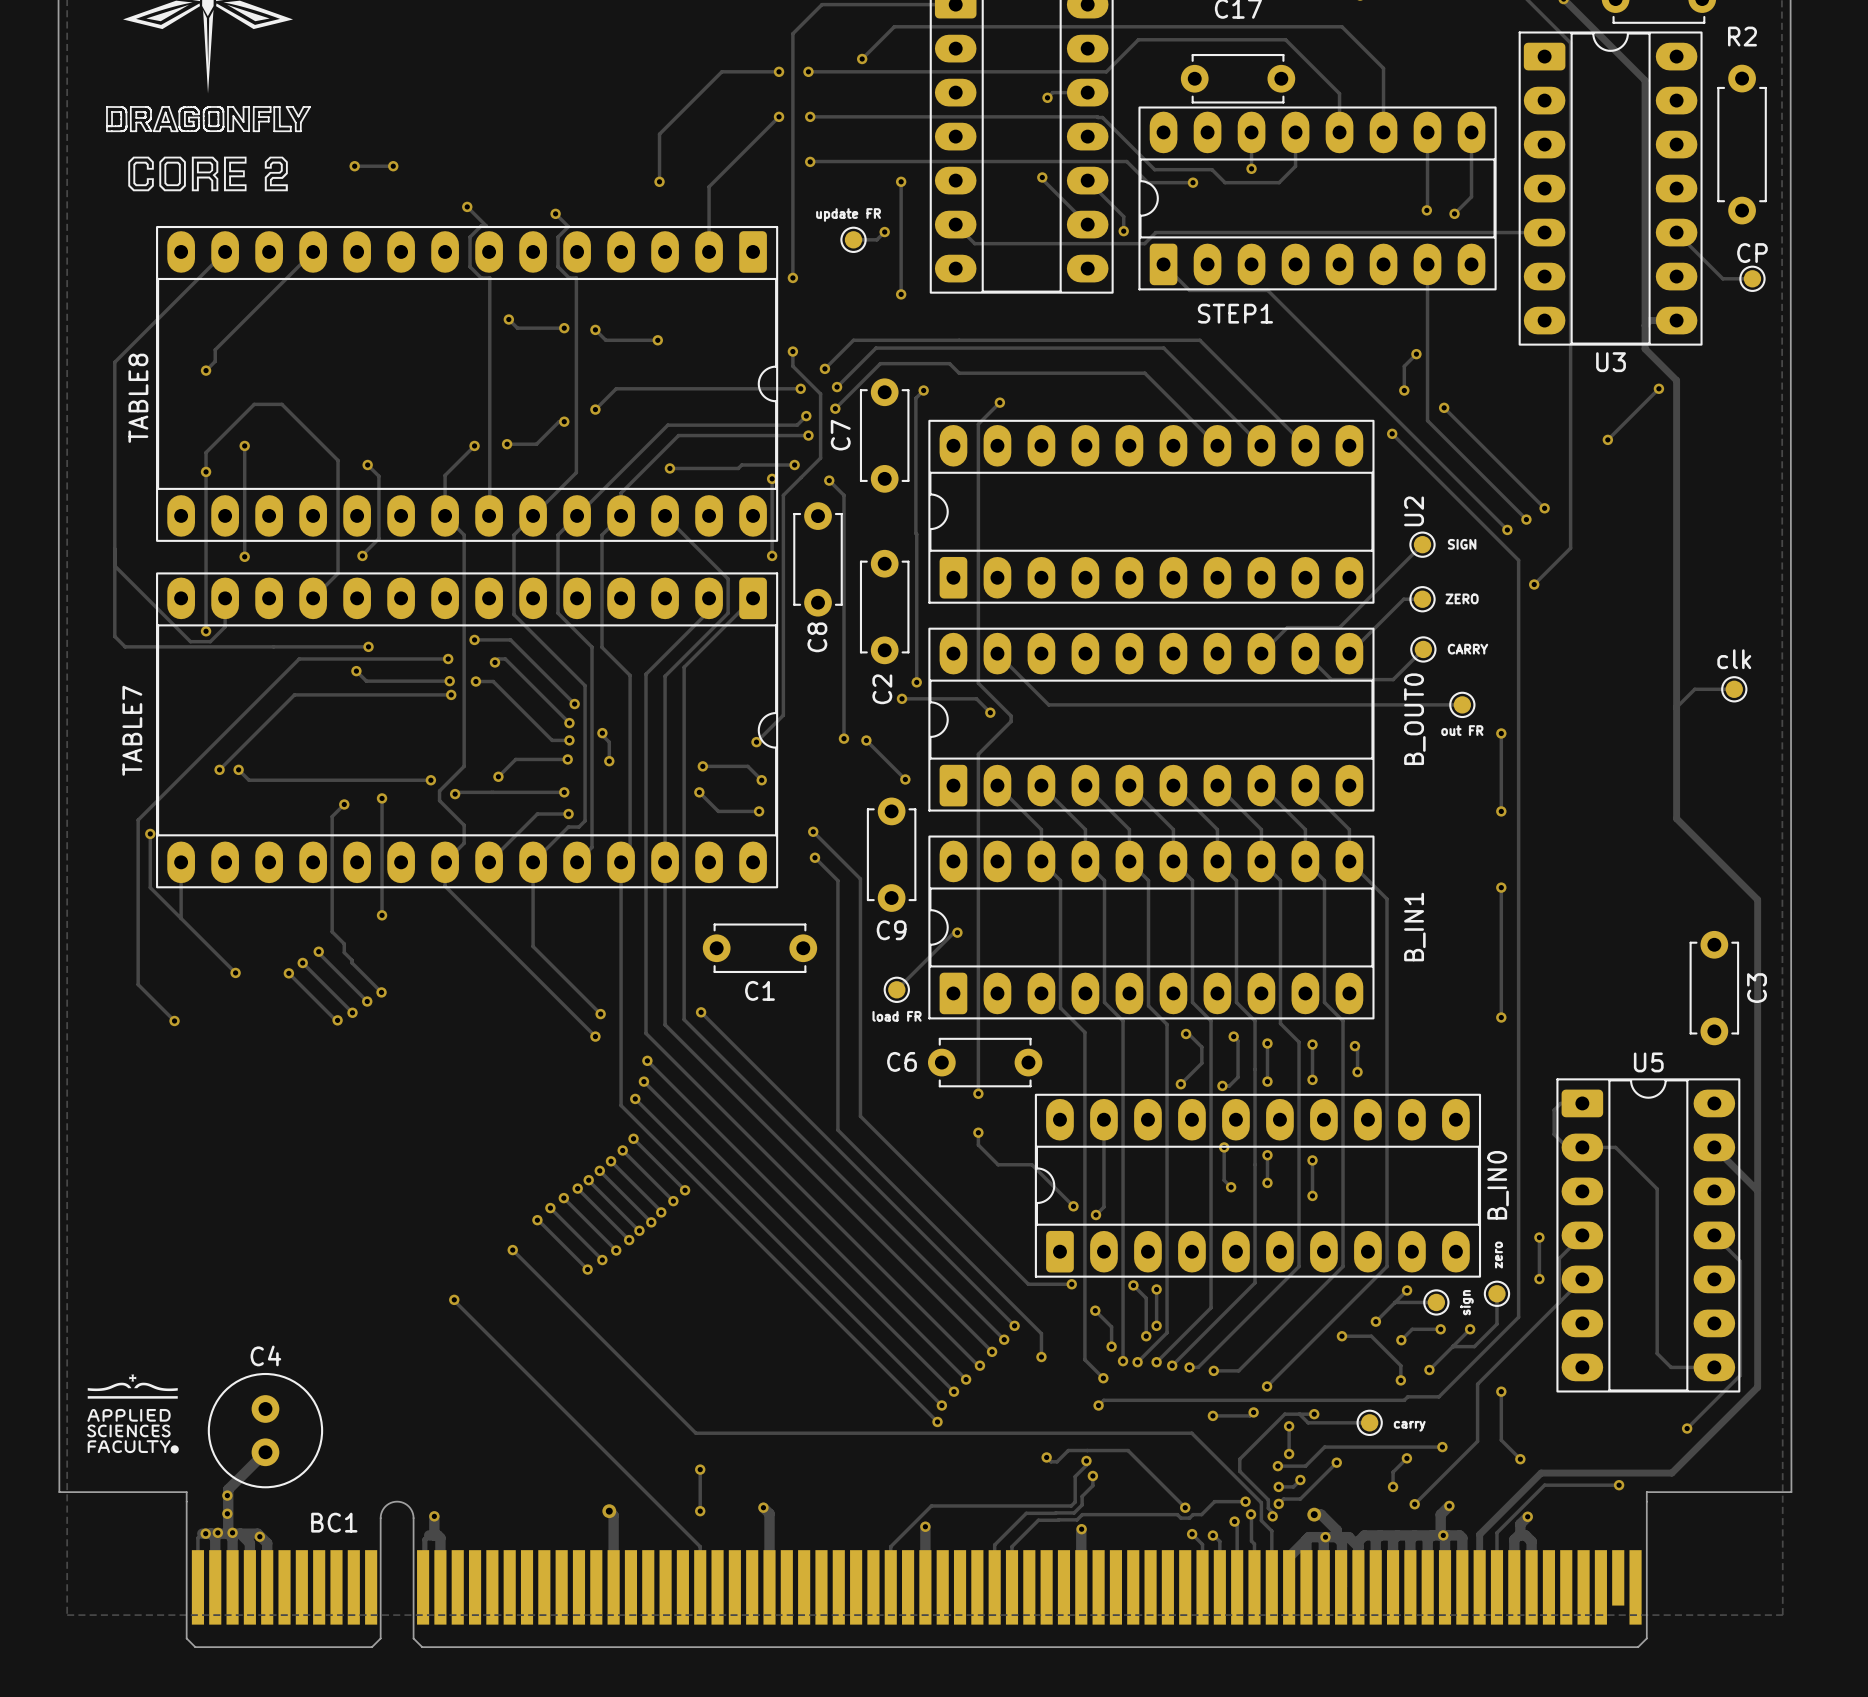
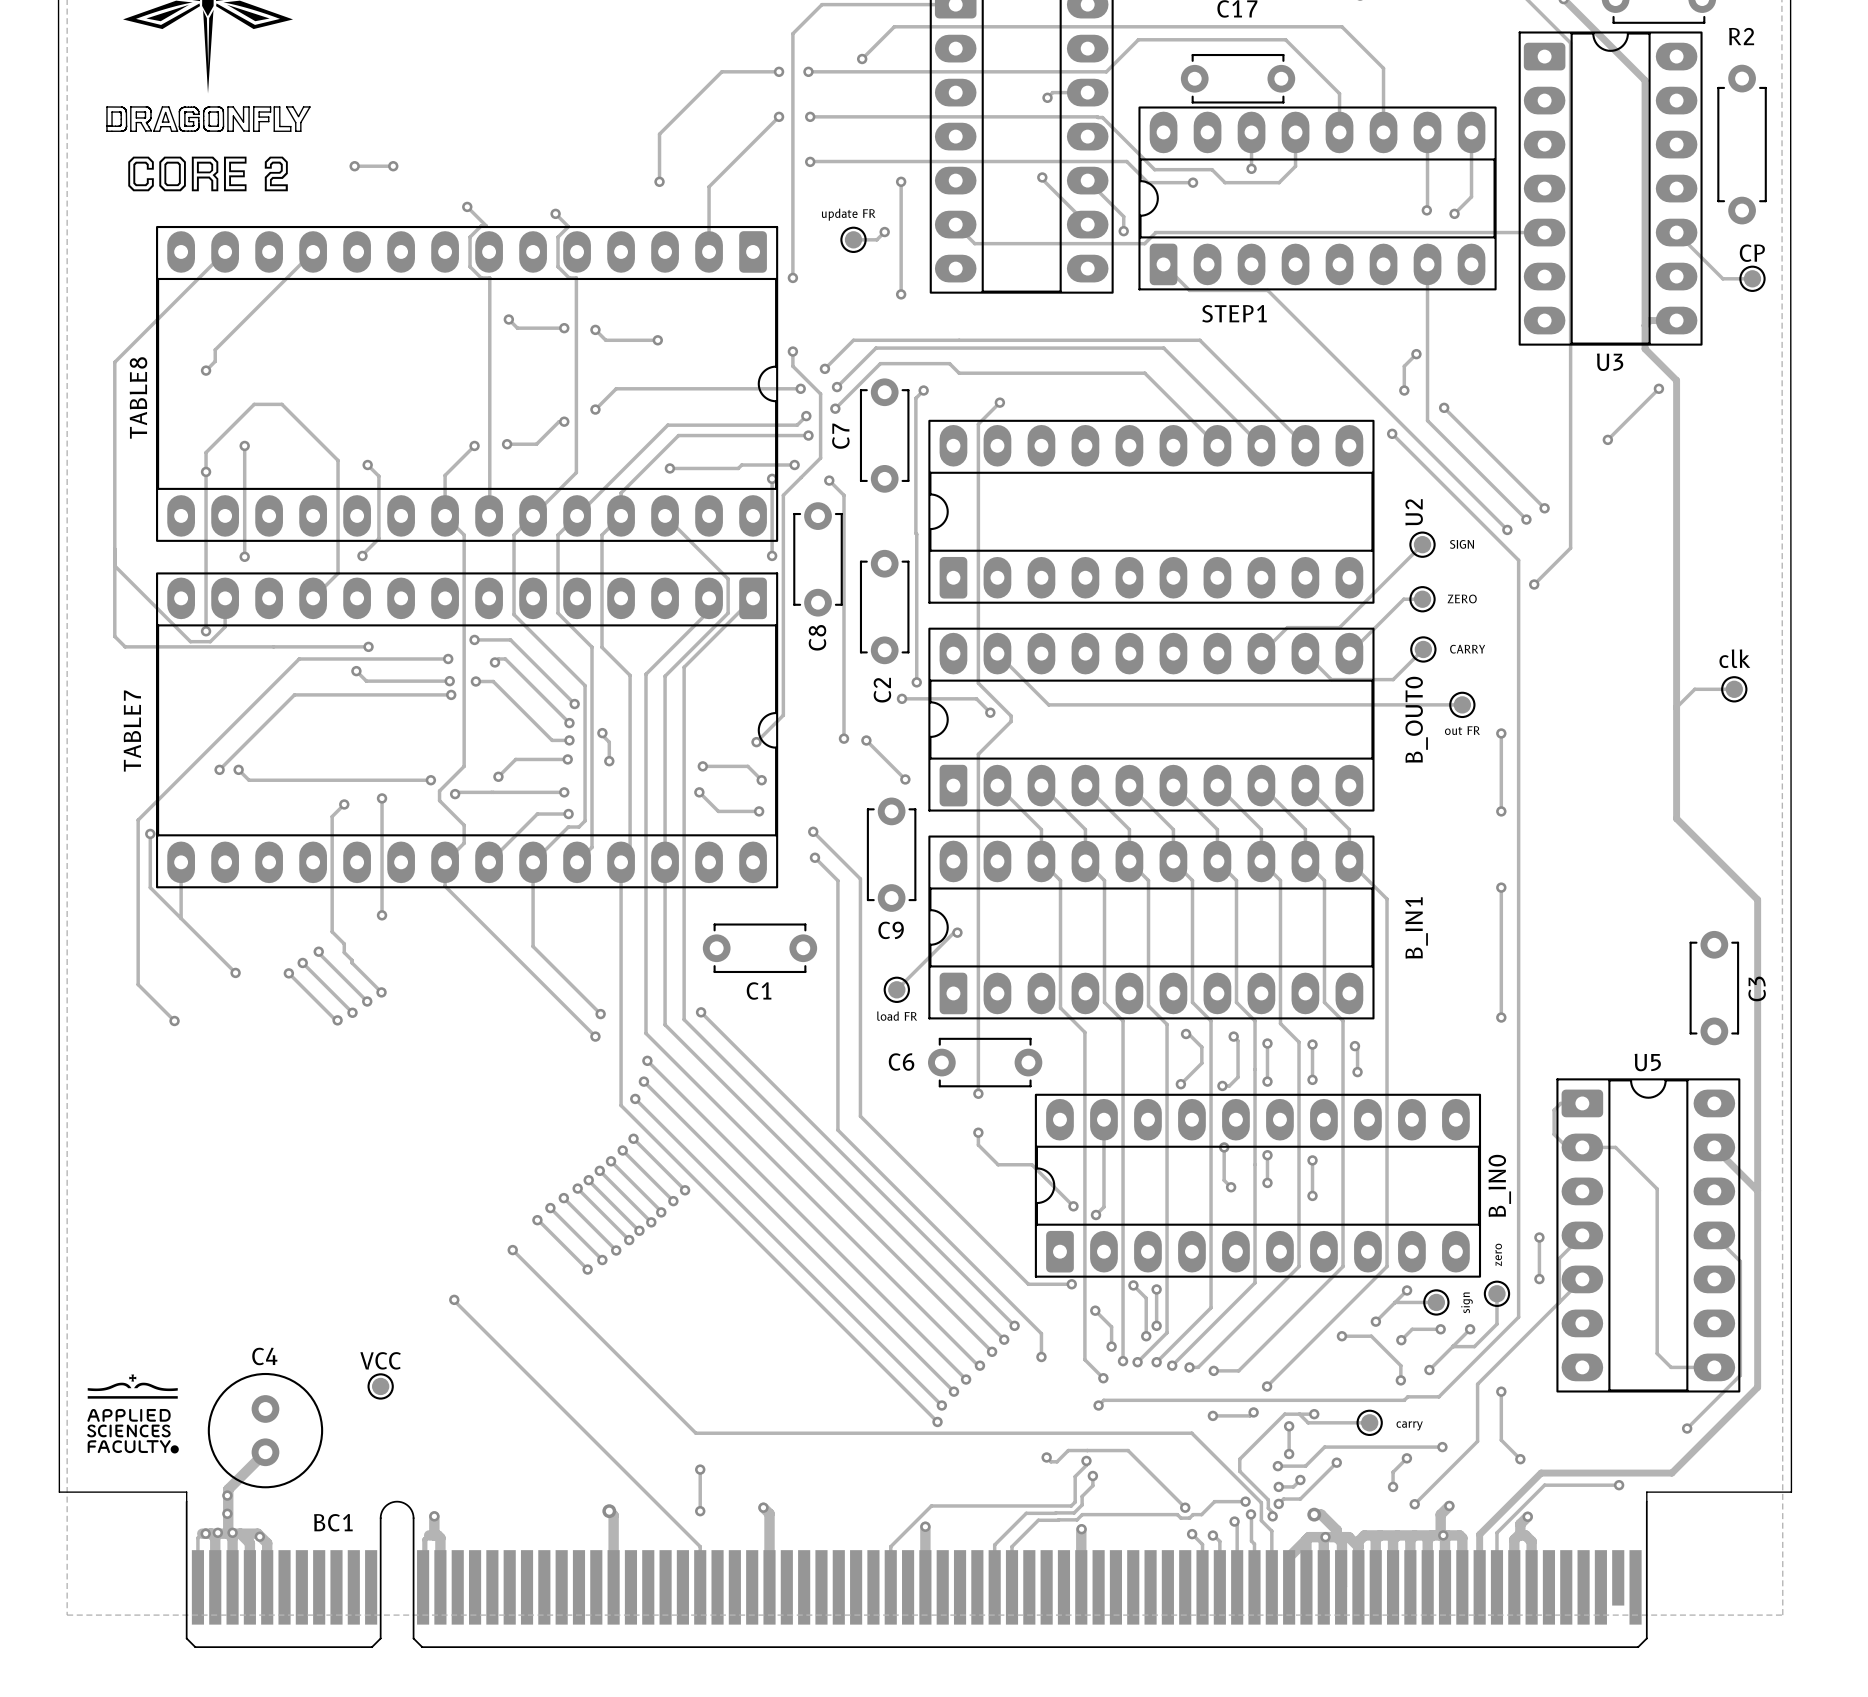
VCC: none -> (380, 1386)

